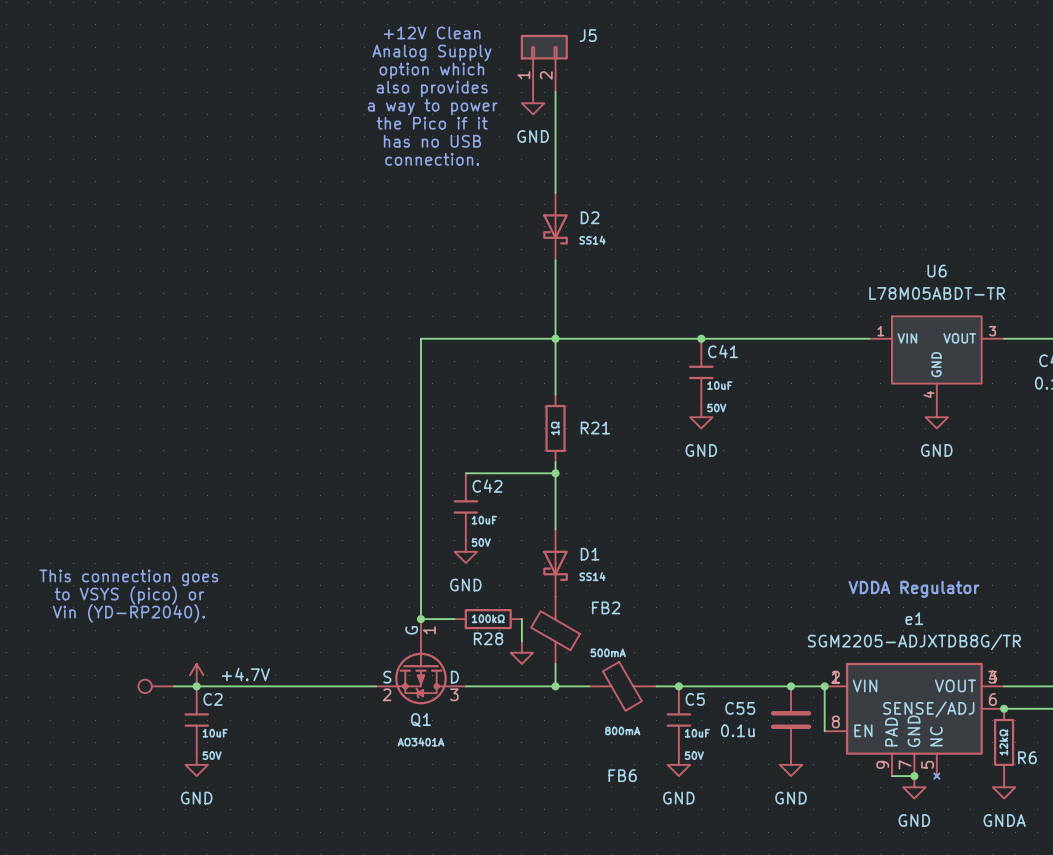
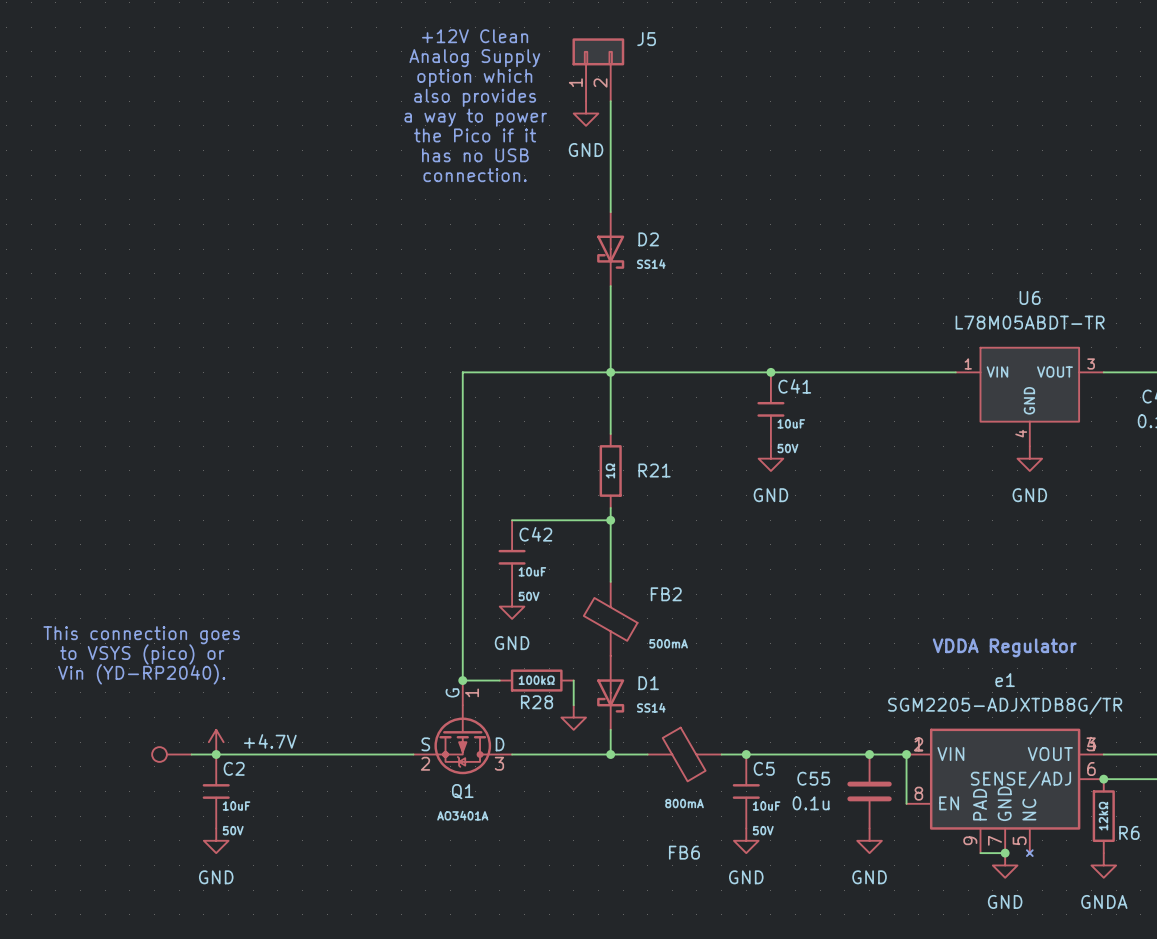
D1 position: (555, 563) -> (610, 692)
FB2 position: (555, 630) -> (610, 618)

